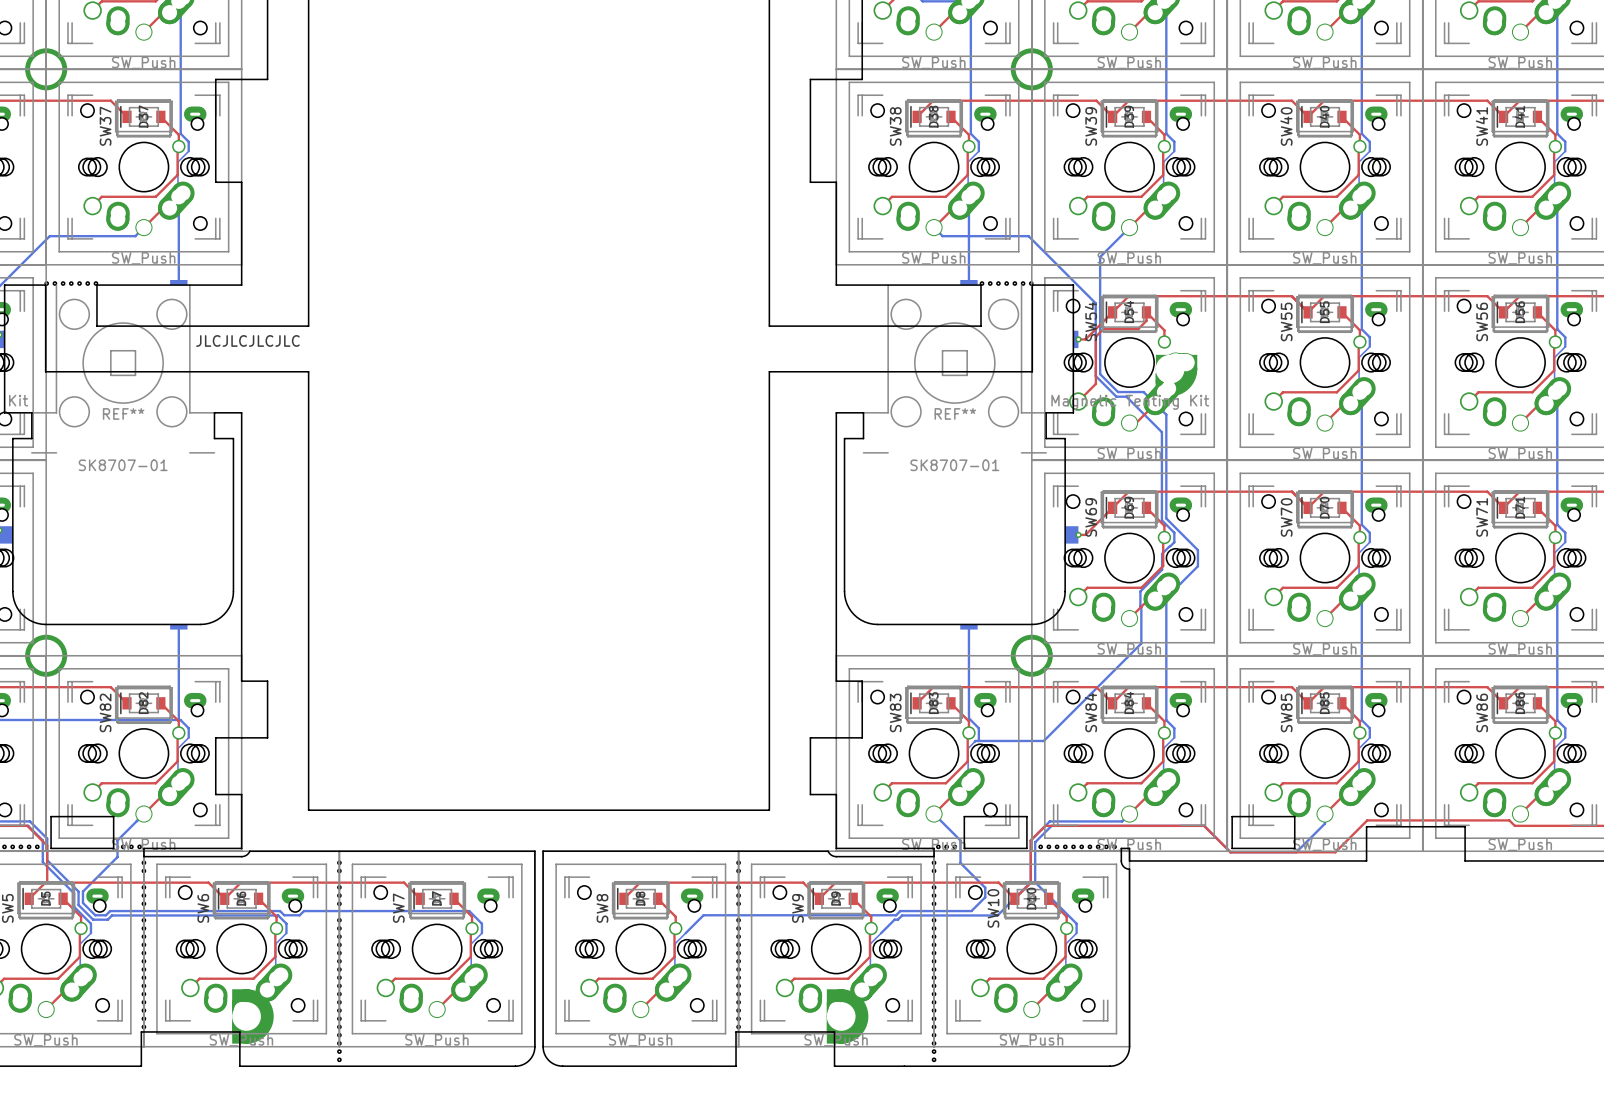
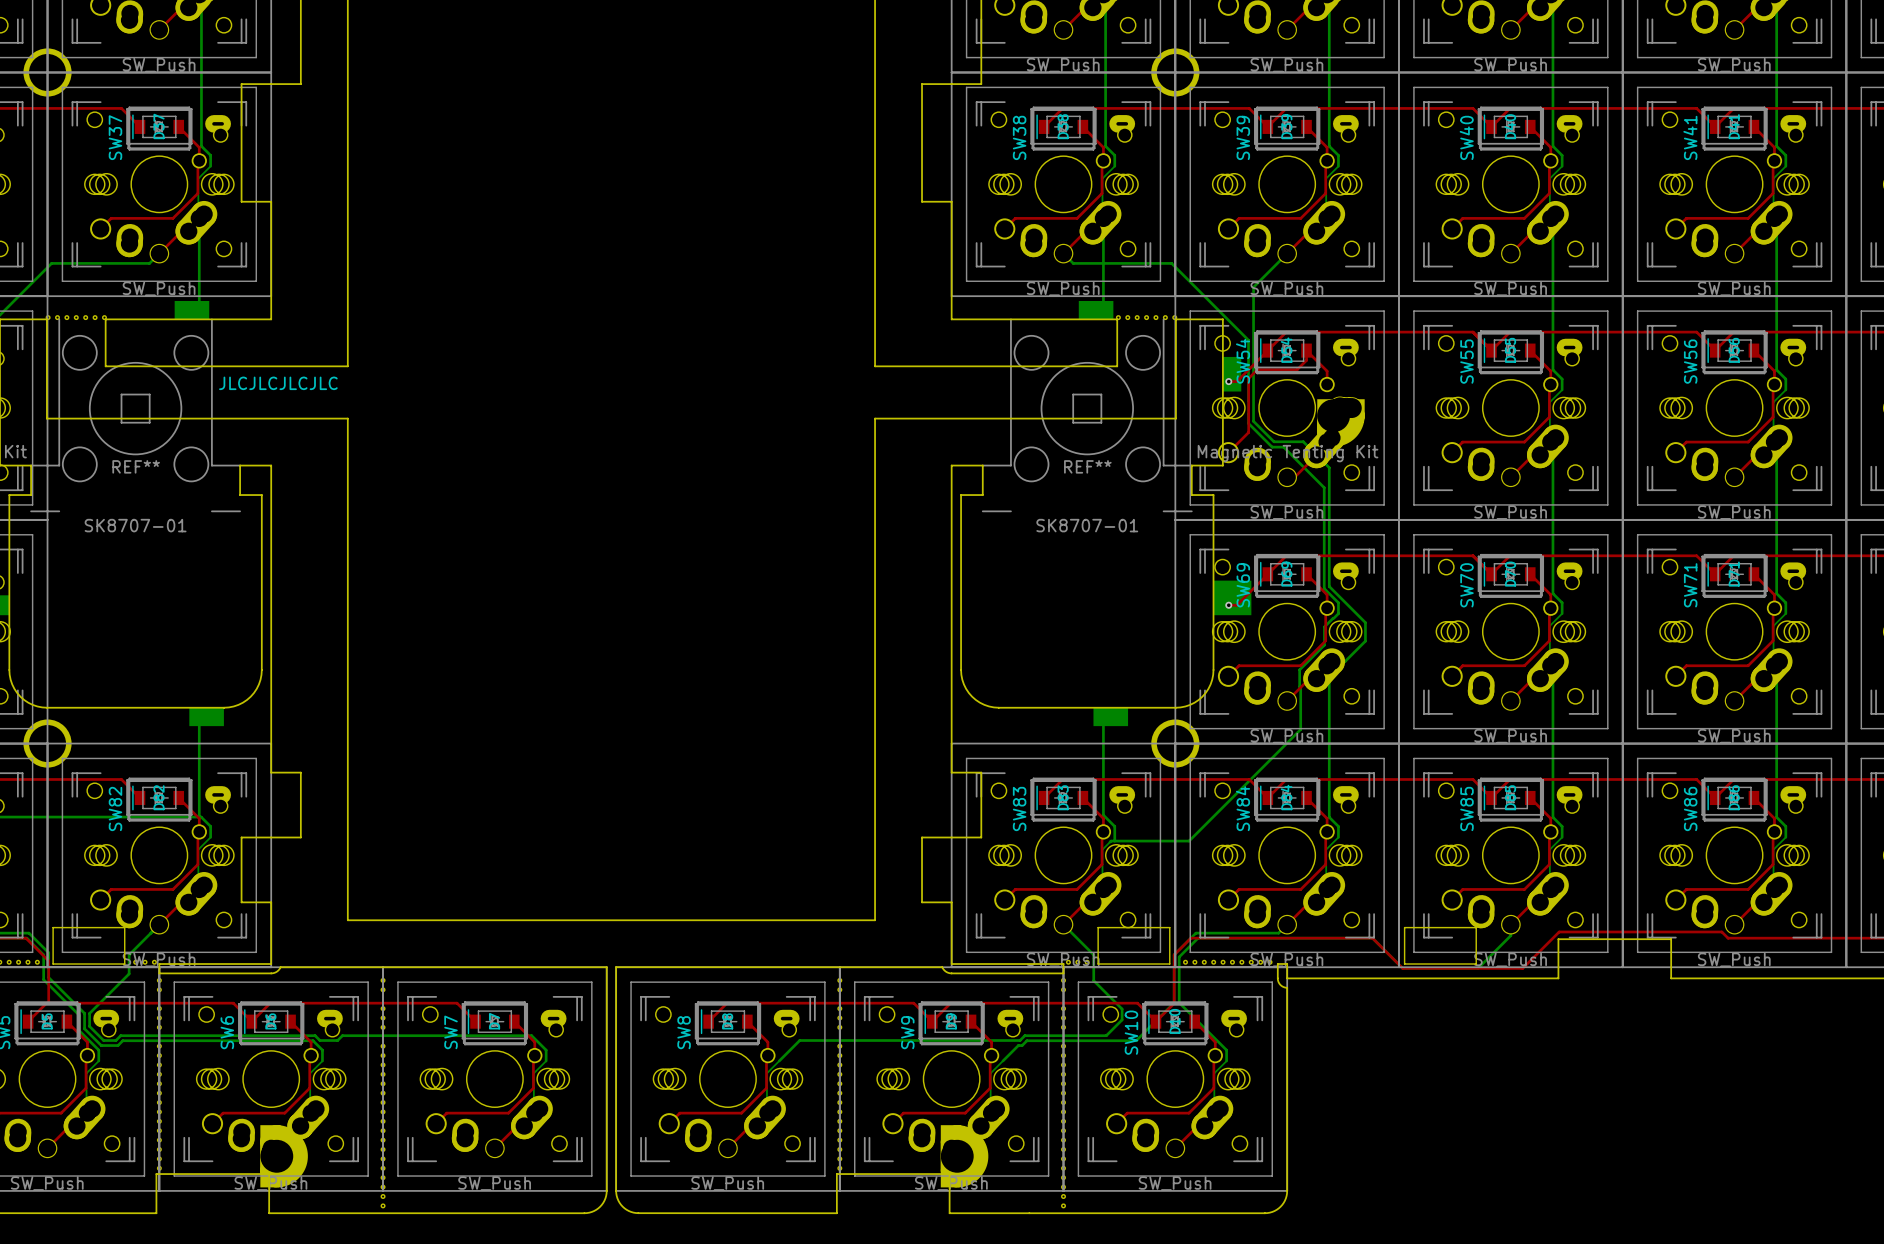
part footprint: [170, 279, 188, 286] -> [174, 300, 210, 320]
part footprint: [960, 279, 978, 286] -> [1078, 300, 1114, 320]
part footprint: [1073, 330, 1079, 349] -> [1222, 356, 1242, 392]
part: none -> (1232, 597)
part: (1071, 534) -> none
part footprint: [170, 624, 188, 630] -> [189, 707, 224, 727]
part footprint: [960, 624, 978, 630] -> [1093, 707, 1129, 727]

